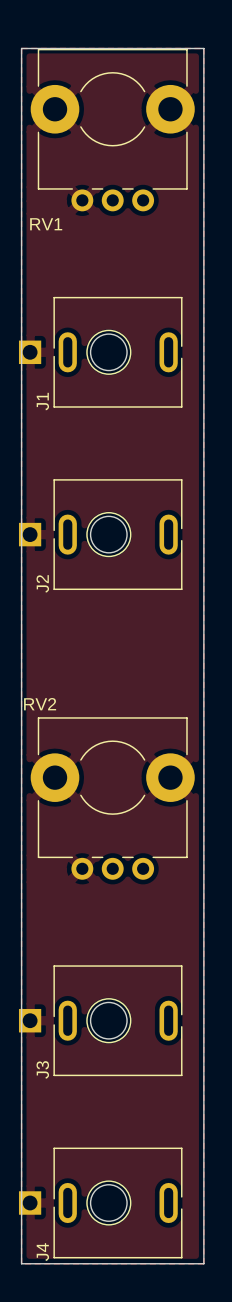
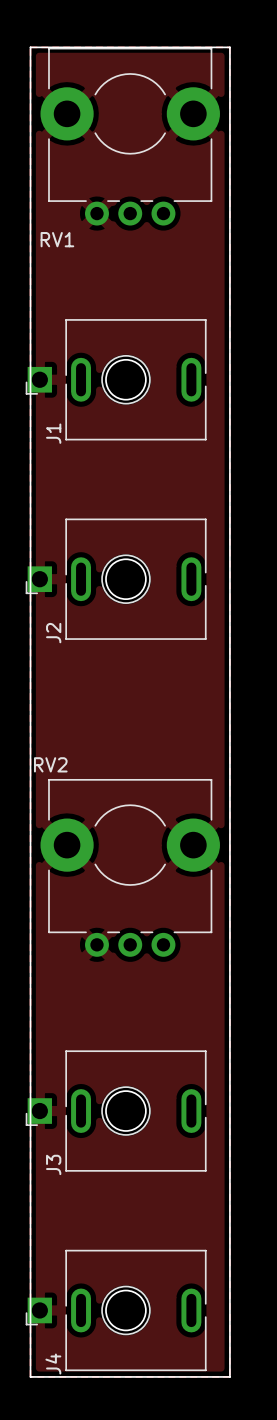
J1 footprint: [18, 296, 183, 408] -> [25, 319, 207, 441]
J2 footprint: [18, 479, 183, 591] -> [25, 518, 207, 640]
J3 footprint: [18, 965, 183, 1077] -> [25, 1050, 207, 1172]
J4 footprint: [18, 1147, 183, 1259] -> [25, 1249, 207, 1372]

